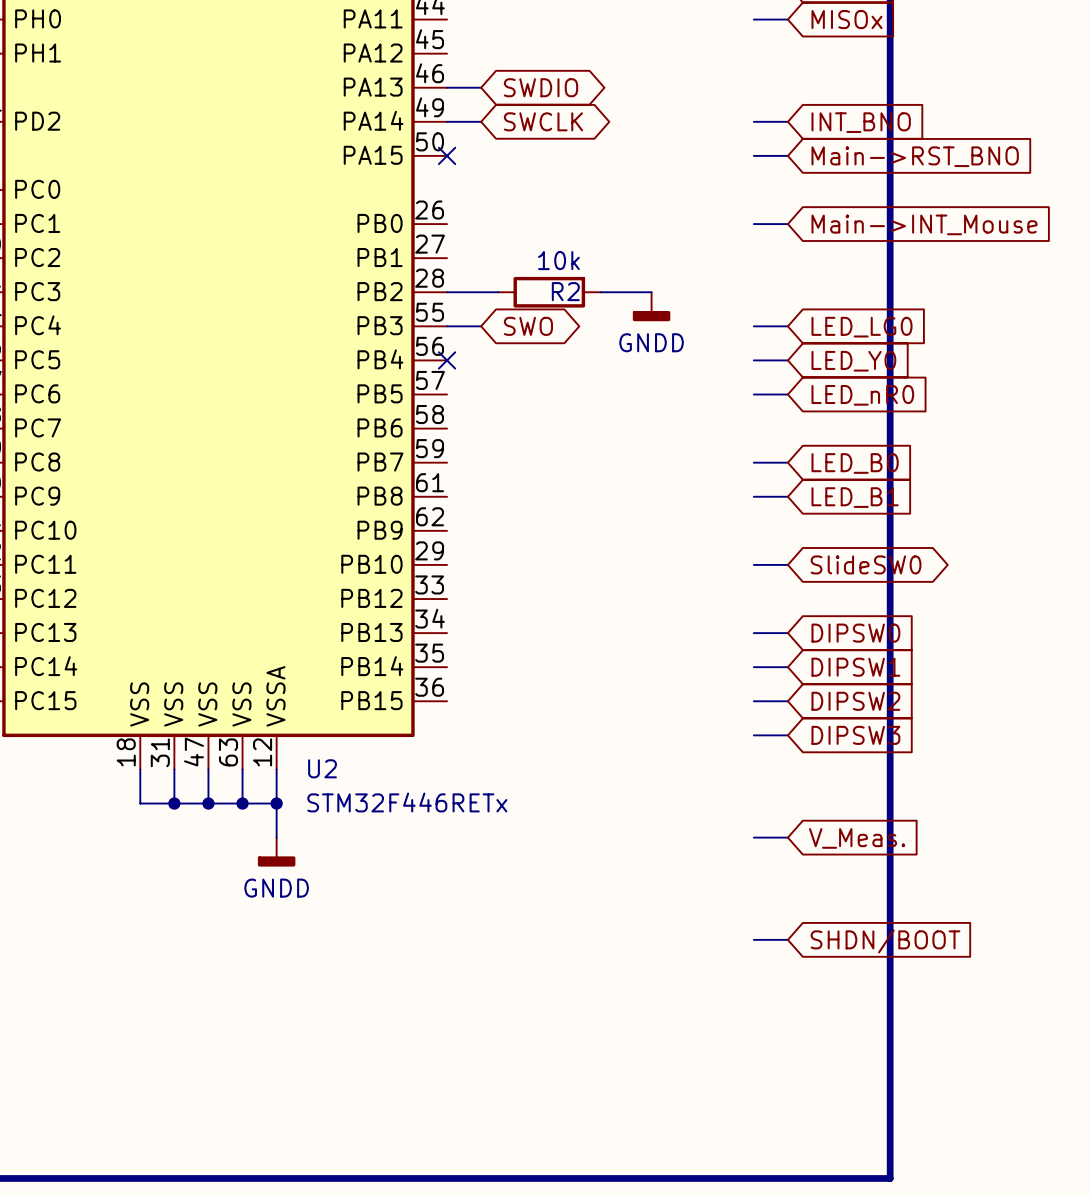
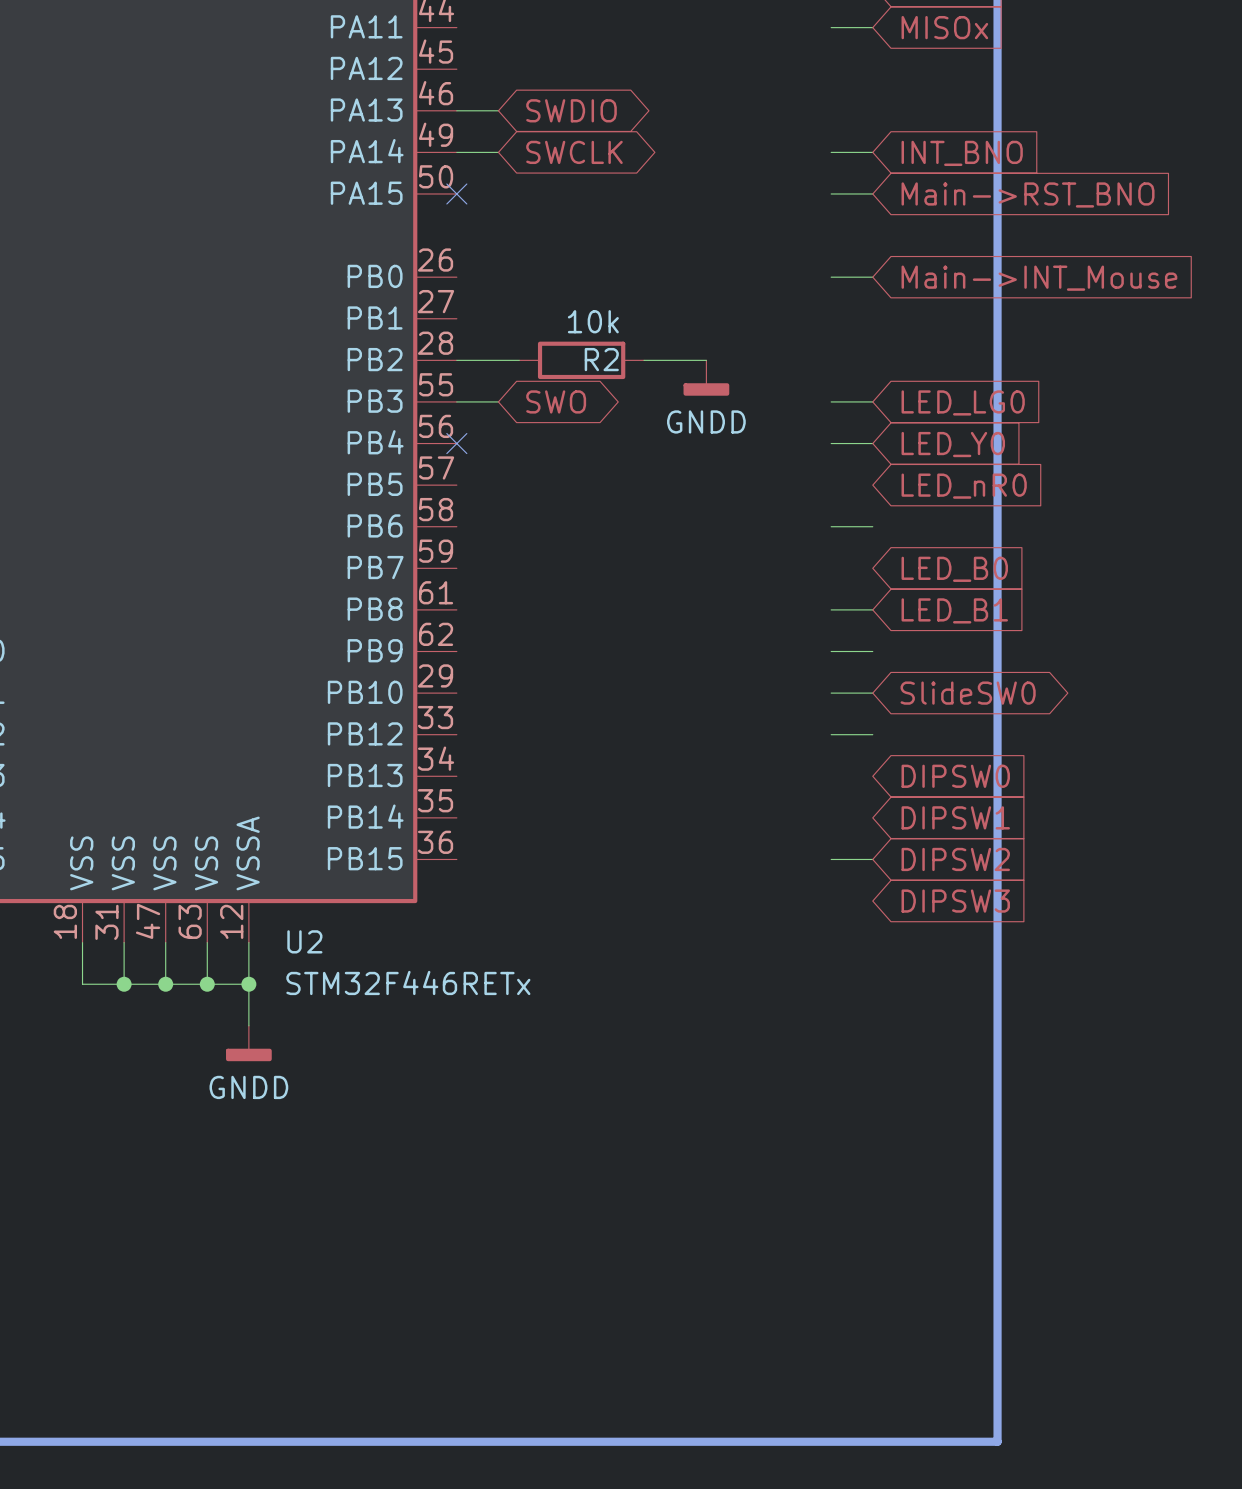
wire: (753, 394) (787, 394) -> (831, 651) (872, 651)
wire: (753, 462) (787, 462) -> (831, 526) (872, 526)
wire: (753, 633) (787, 633) -> (831, 734) (872, 734)
wire: (753, 667) (787, 667) -> none
wire: (753, 735) (787, 735) -> none
wire: (753, 837) (787, 837) -> none
global label: V_Meas. (857, 838) -> none
wire: (753, 939) (787, 939) -> none
global label: SHDN/BOOT (885, 941) -> none

